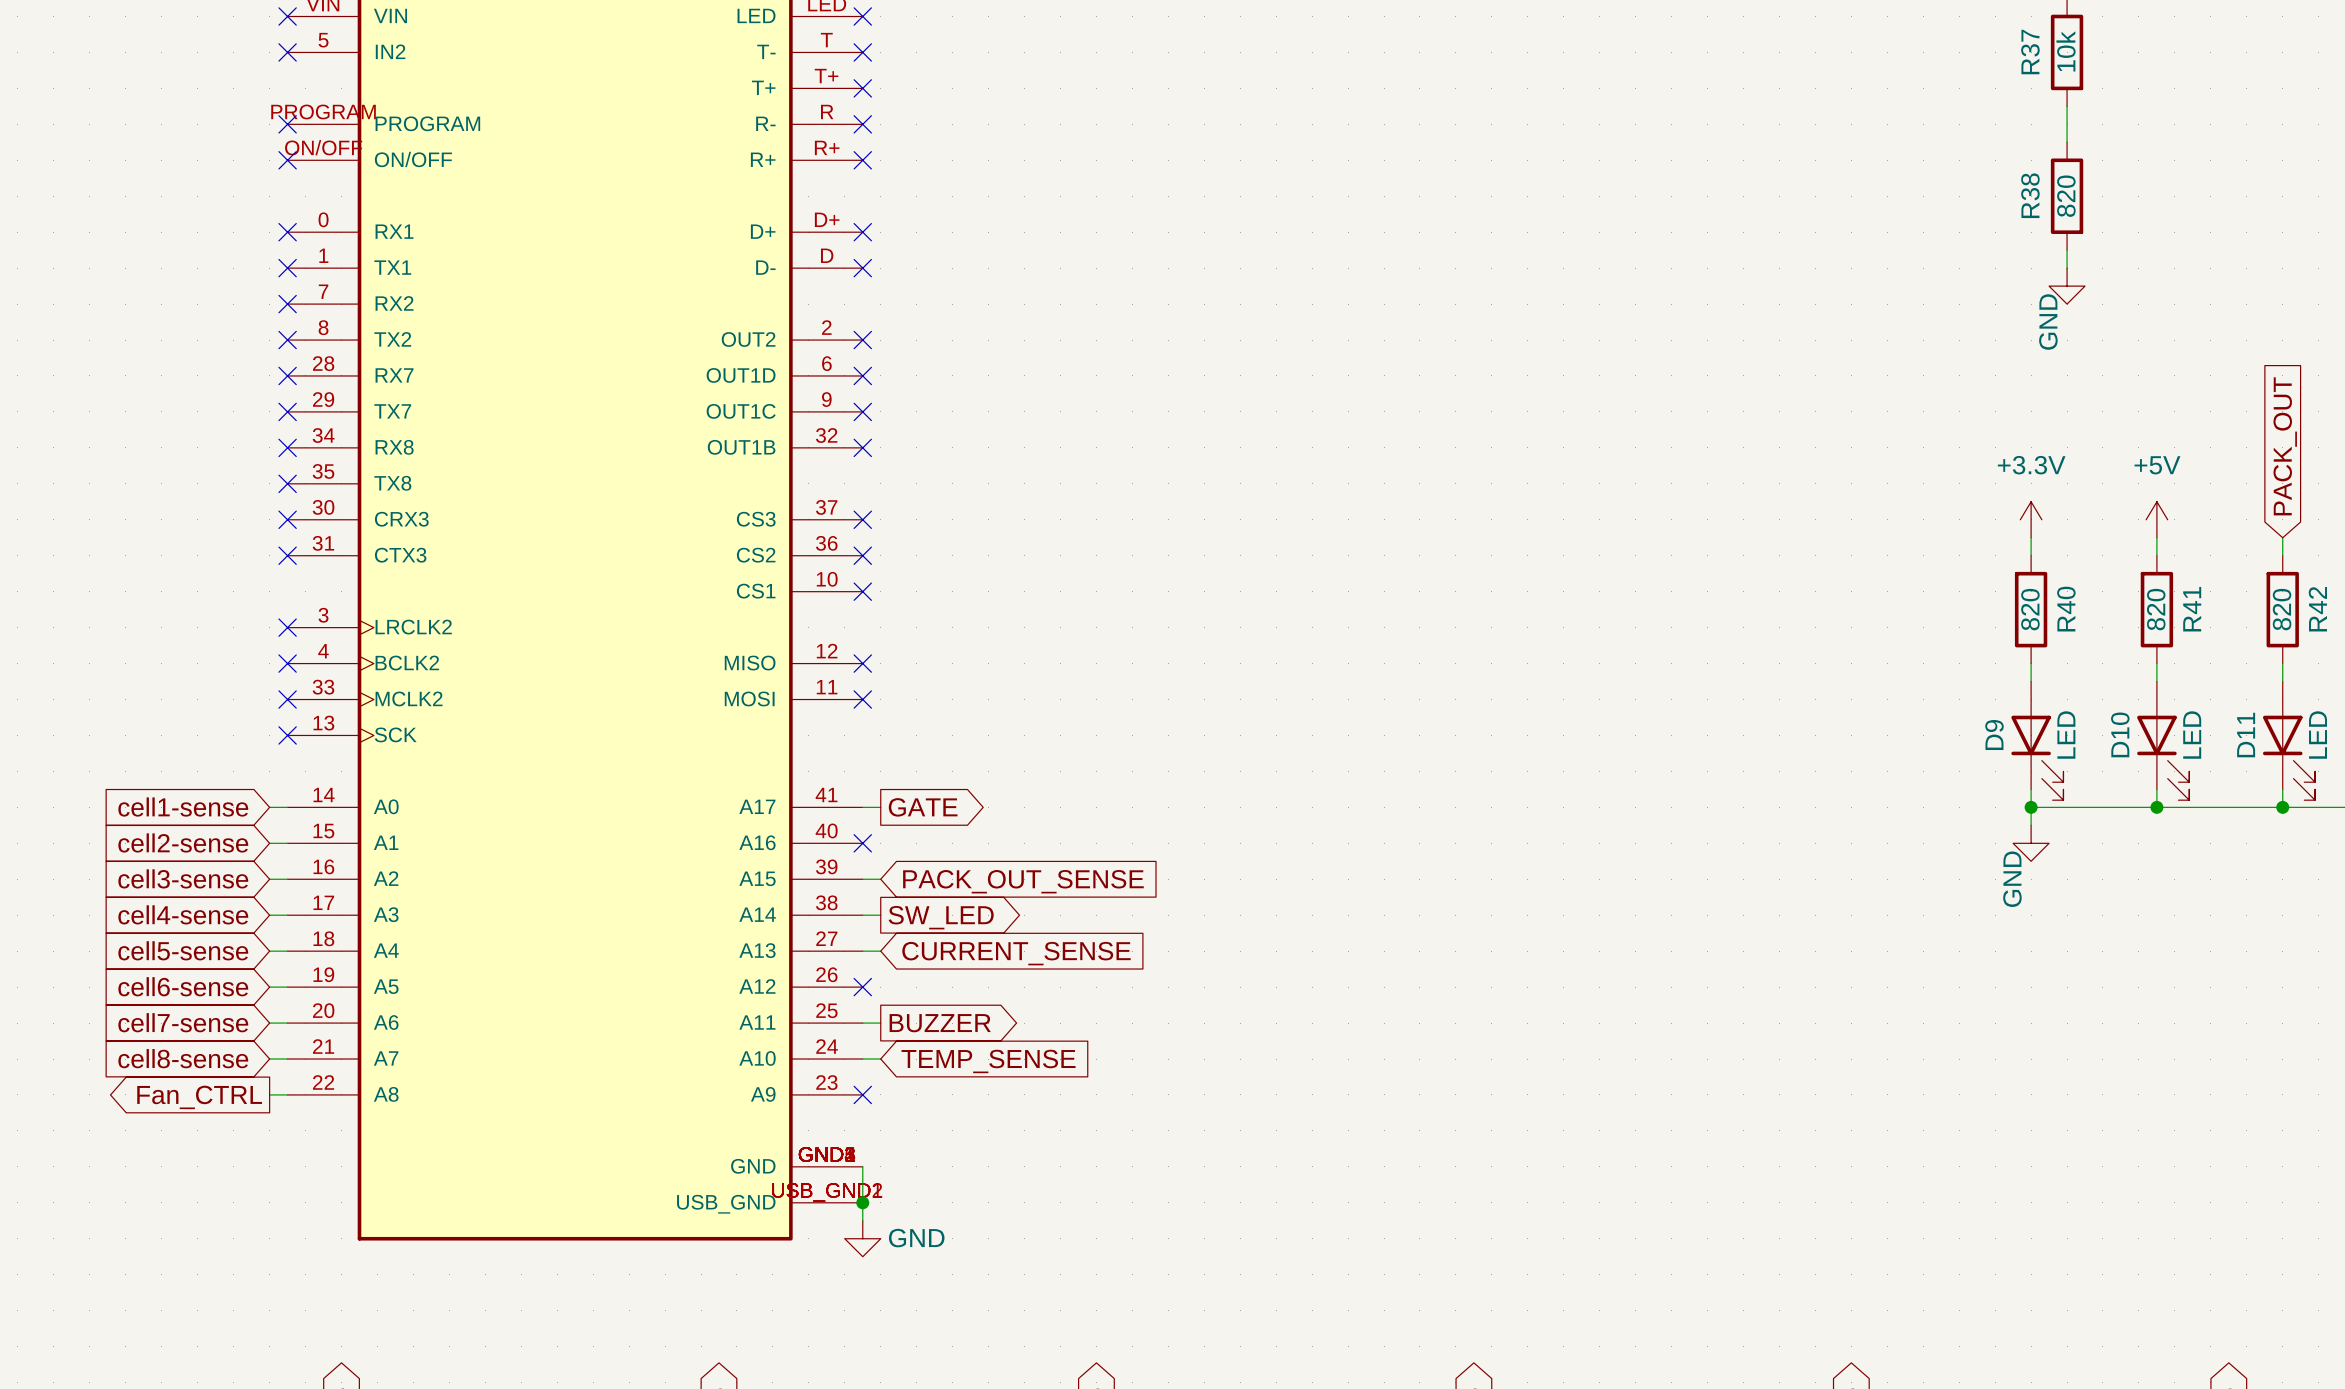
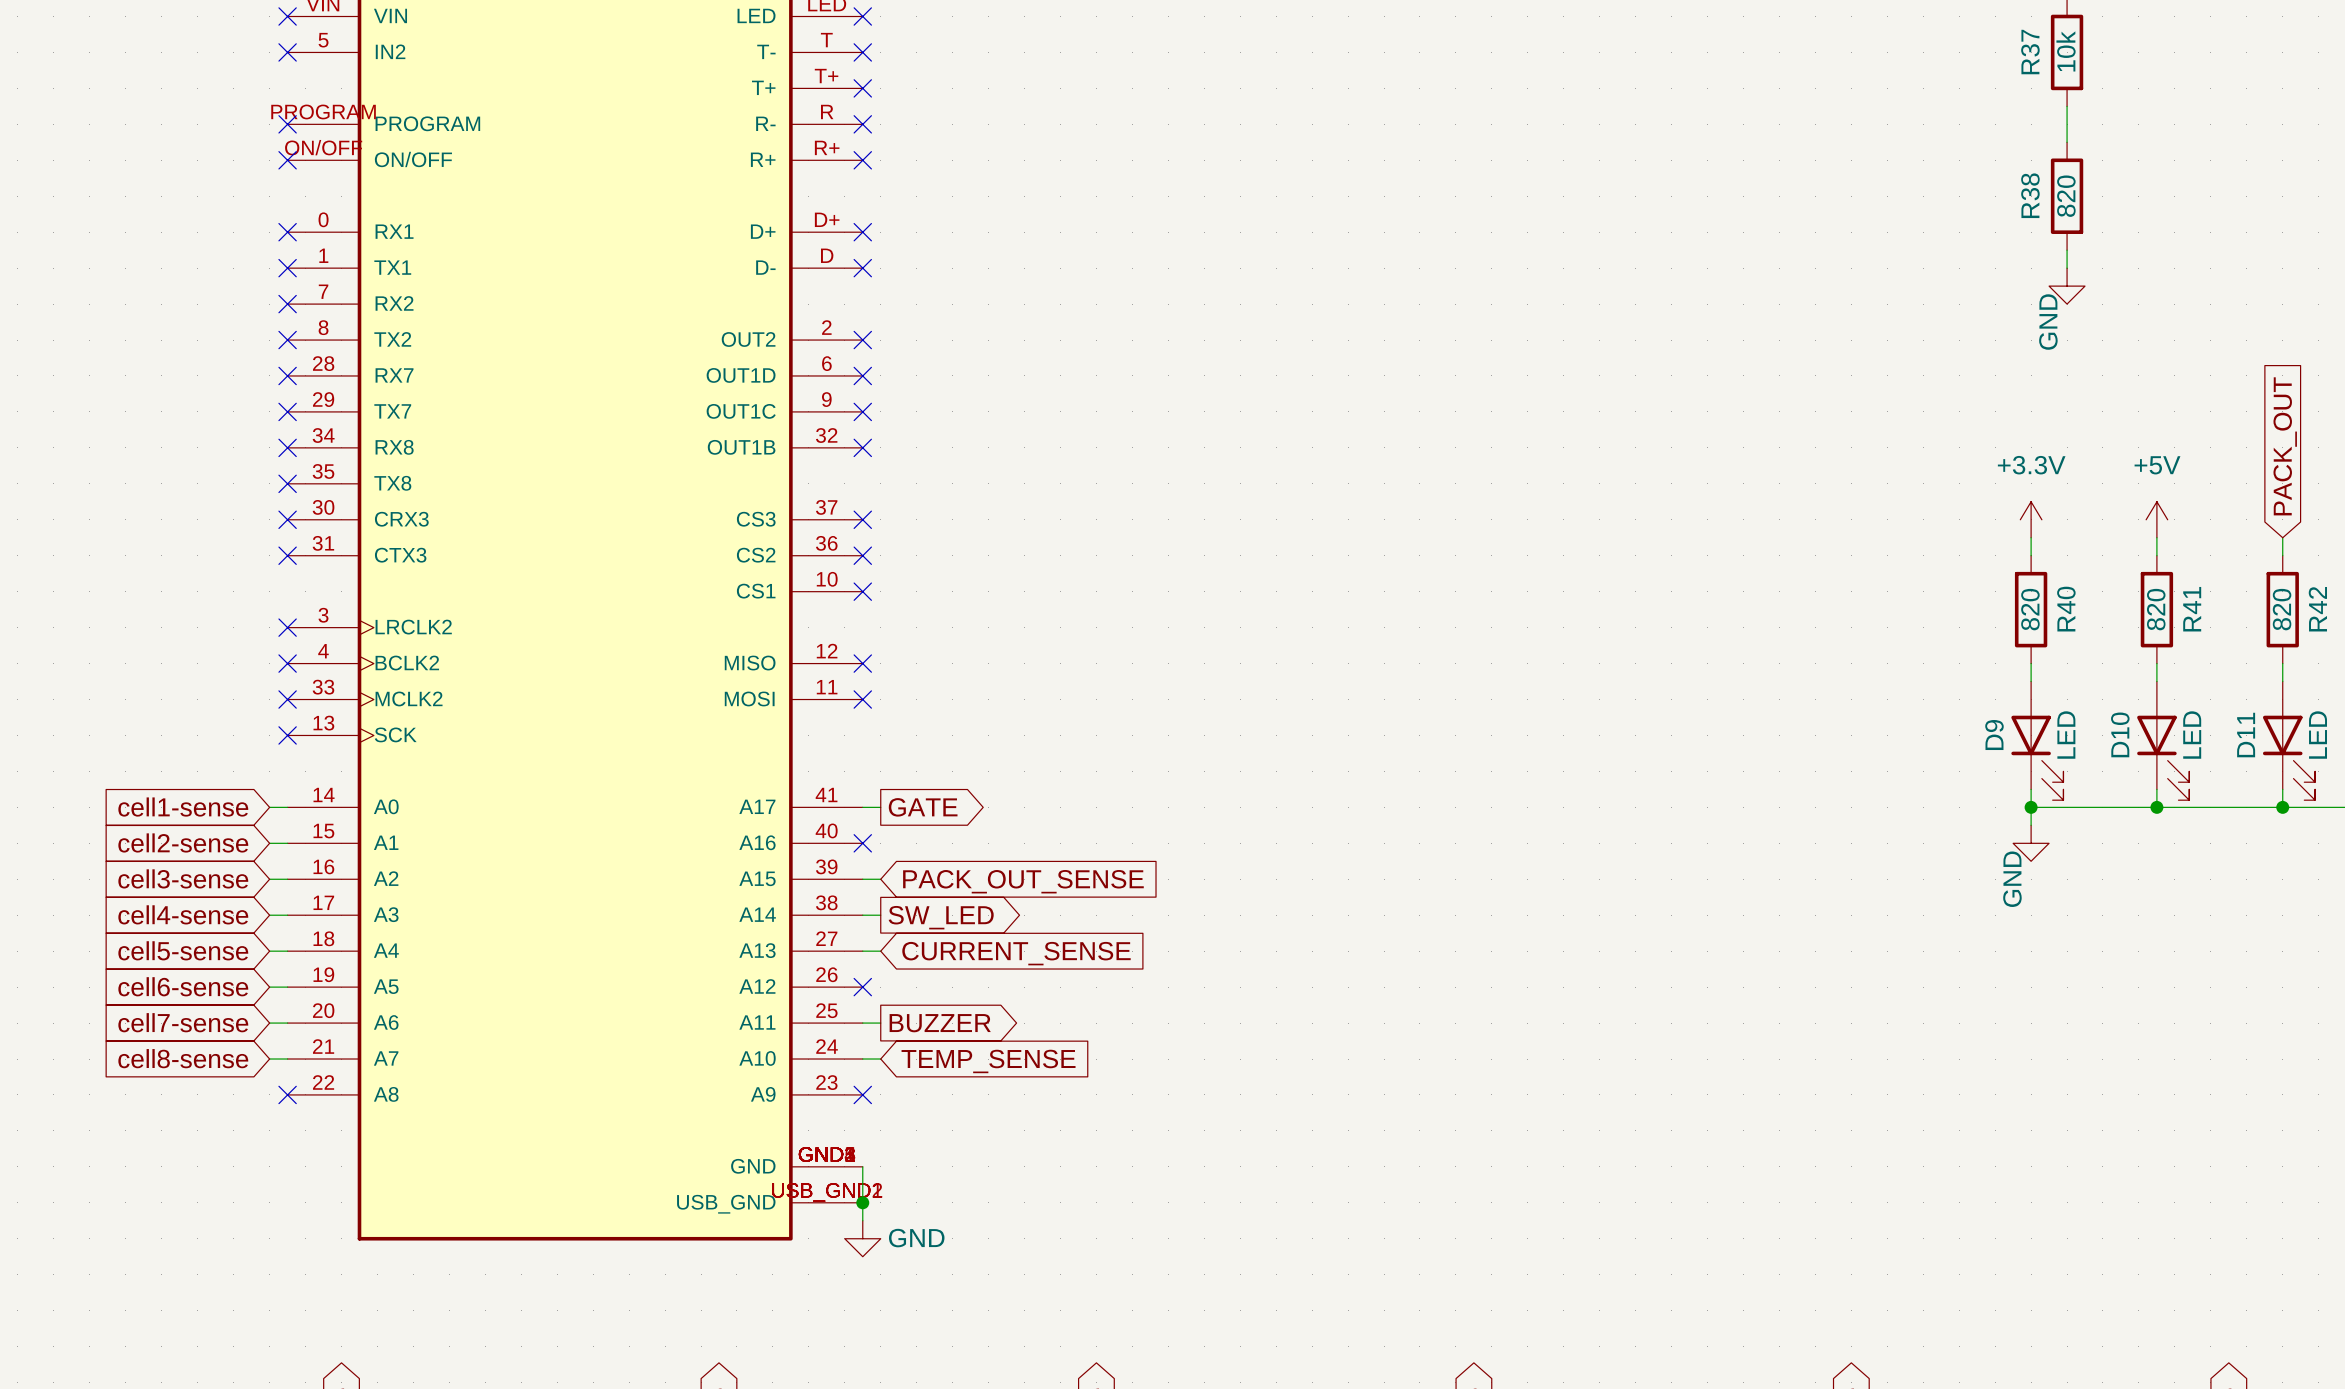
wire: (269, 1094) (287, 1094) -> none
no-connect mark: none -> (287, 1094)
global label: Fan_CTRL (199, 1097) -> none

